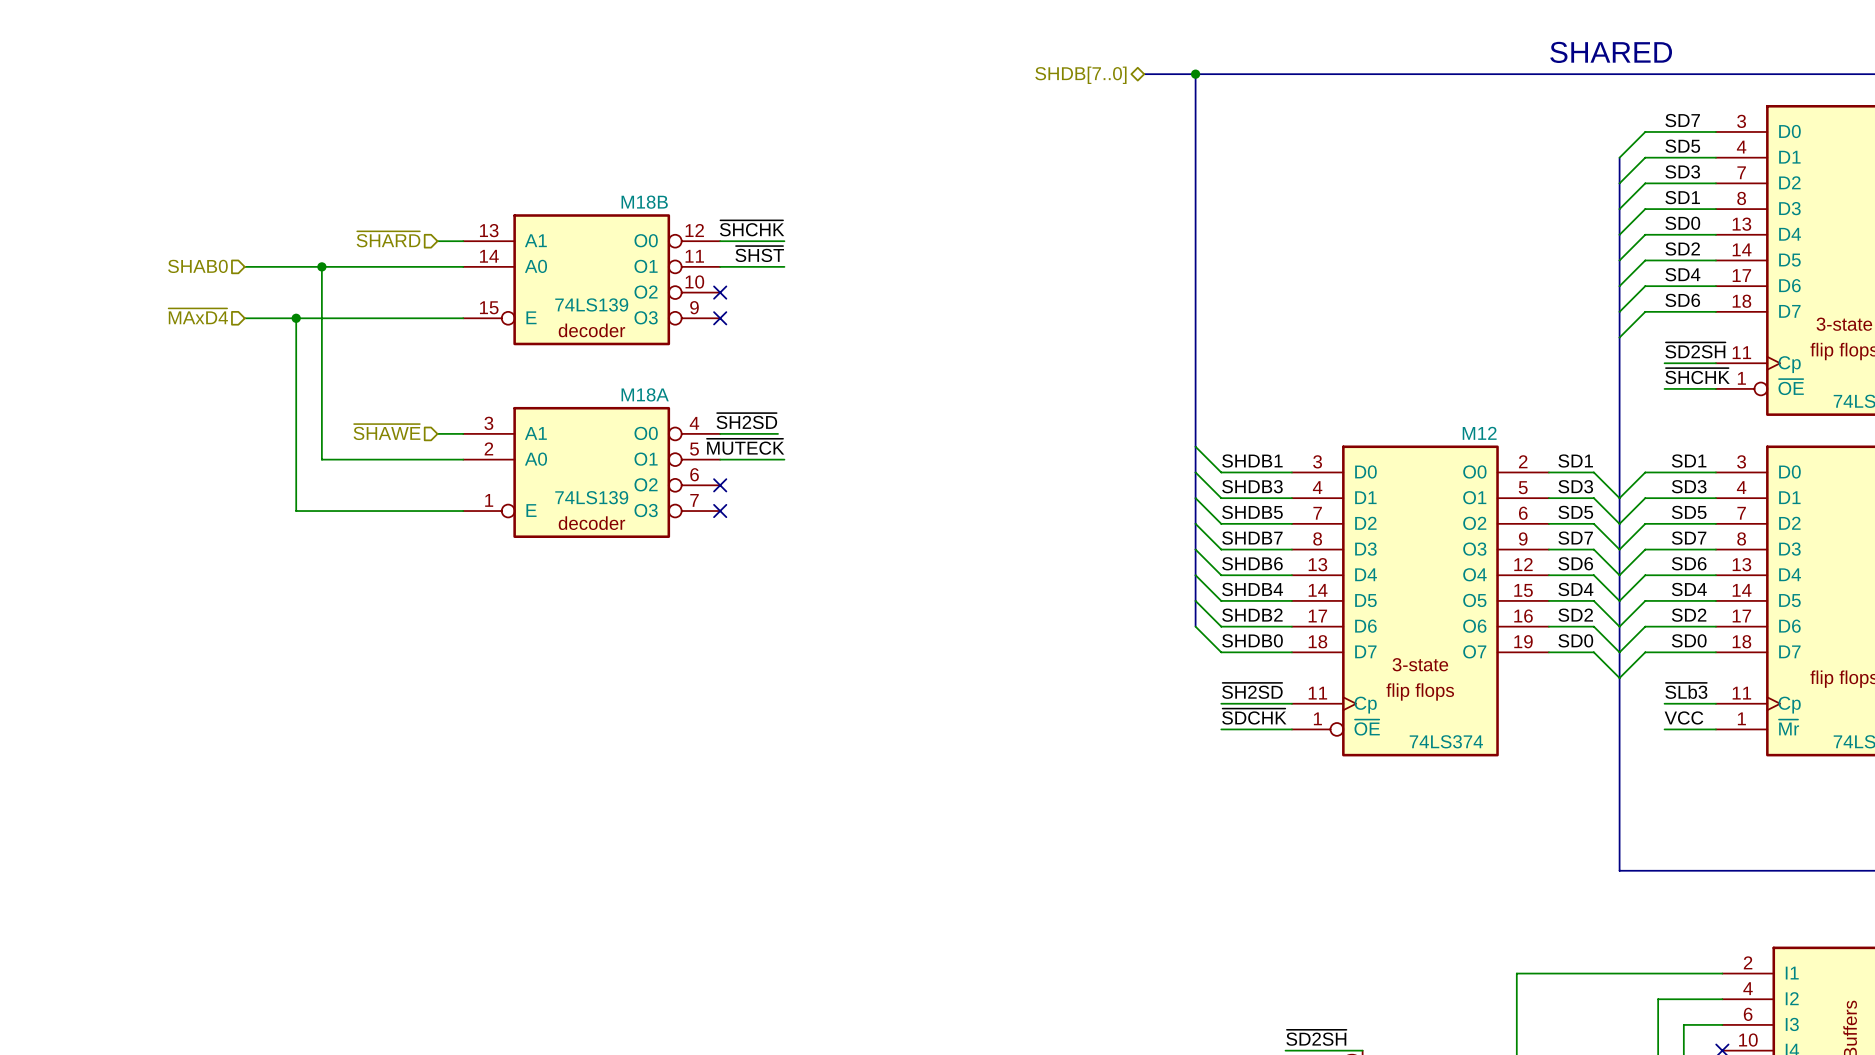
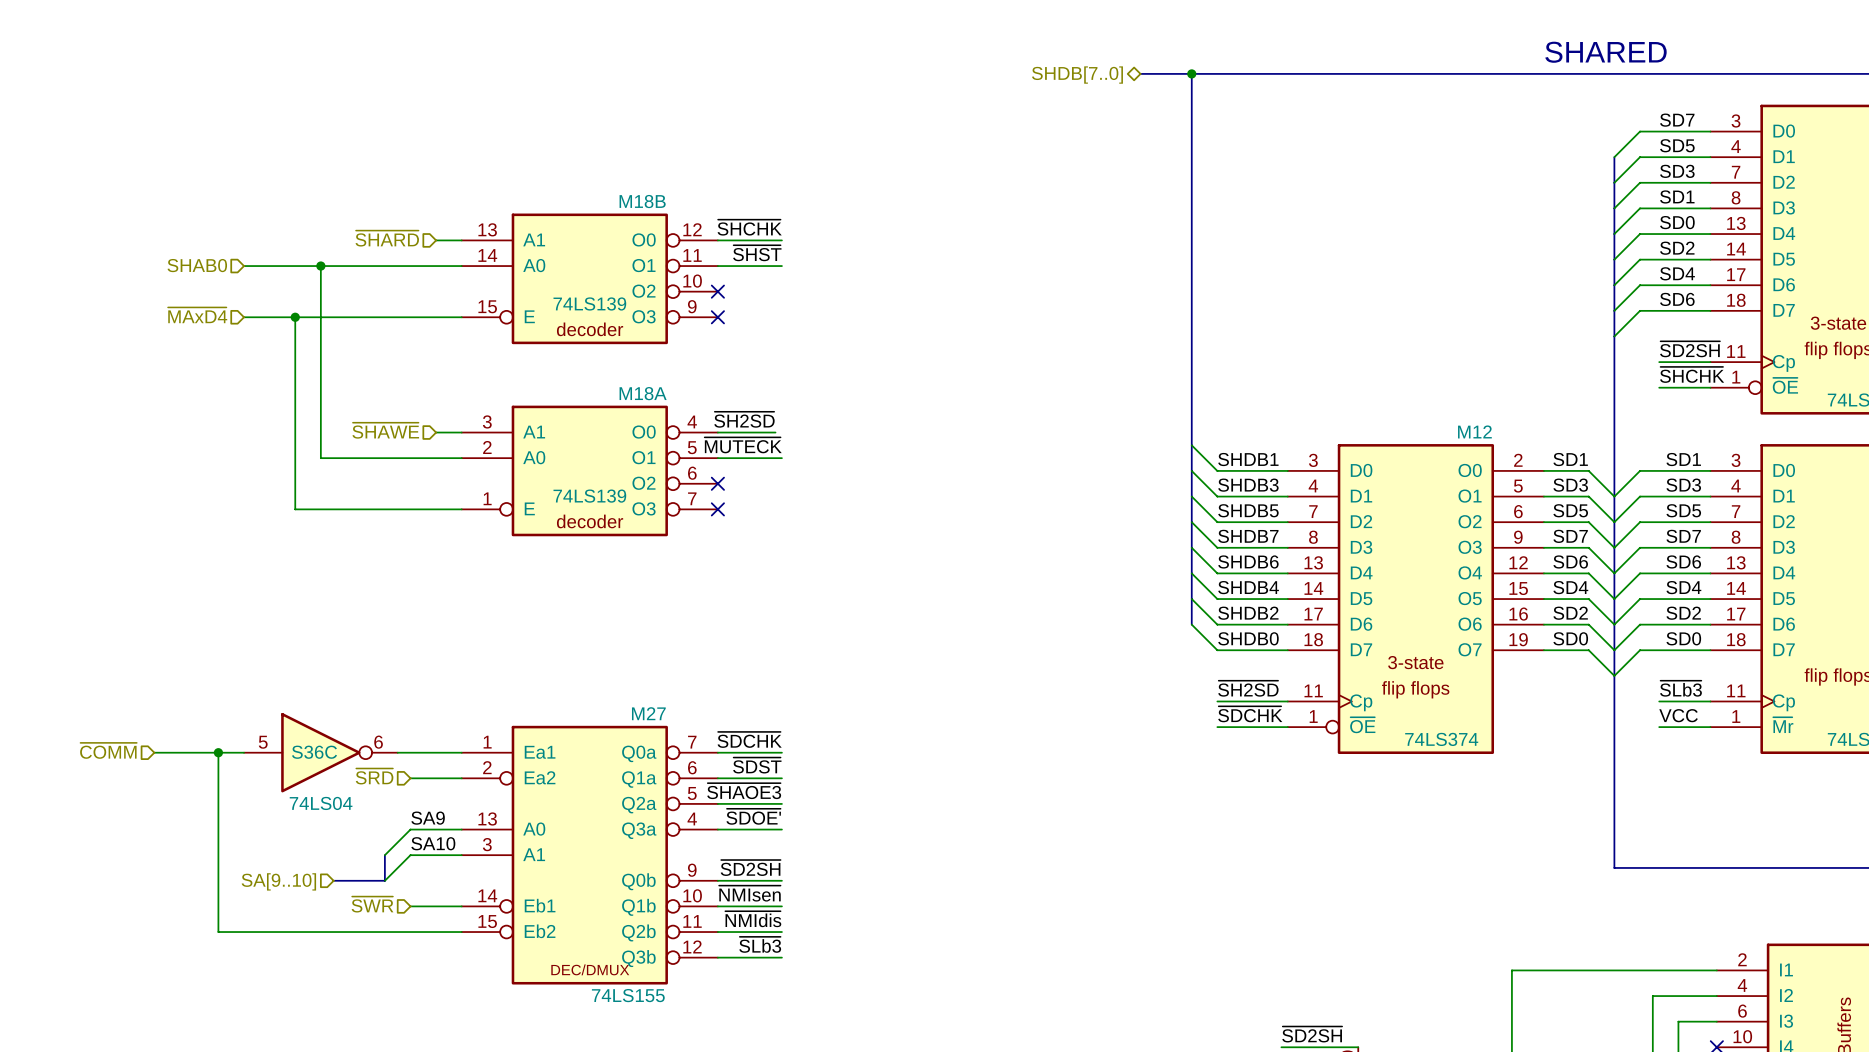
label: none -> ~{SDCHK} (749, 739)
hierarchical label: none -> ~{COMM} (108, 750)
wire: none -> (154, 752) (244, 752)
wire: none -> (218, 752) (218, 932) (461, 932)
junction: none -> (218, 752)
S36C: none -> 74LS04 (320, 752)
wire: none -> (397, 752) (461, 752)
wire: none -> (717, 752) (781, 752)
label: none -> ~{SDST} (757, 765)
hierarchical label: none -> ~{SRD} (374, 776)
wire: none -> (410, 778) (461, 778)
wire: none -> (717, 778) (781, 778)
label: none -> ~{SHAOE3} (744, 791)
wire: none -> (717, 803) (781, 803)
label: none -> ~{SDOE'} (753, 816)
label: none -> SA9 (428, 818)
wire: none -> (461, 829) (410, 829) (384, 855)
wire: none -> (717, 829) (781, 829)
label: none -> SA10 (433, 843)
bus: none -> (384, 855) (384, 880) (333, 880)
wire: none -> (461, 855) (410, 855) (384, 880)
M27: none -> 74LS155 (589, 855)
label: none -> ~{SD2SH} (750, 867)
wire: none -> (717, 880) (781, 880)
hierarchical label: none -> SA[9..10] (278, 881)
label: none -> ~{NMIsen} (749, 893)
hierarchical label: none -> ~{SWR} (372, 904)
wire: none -> (410, 906) (461, 906)
wire: none -> (717, 906) (781, 906)
label: none -> ~{NMIdis} (753, 919)
wire: none -> (717, 932) (781, 932)
label: none -> ~{SLb3} (760, 944)
wire: none -> (717, 957) (781, 957)

